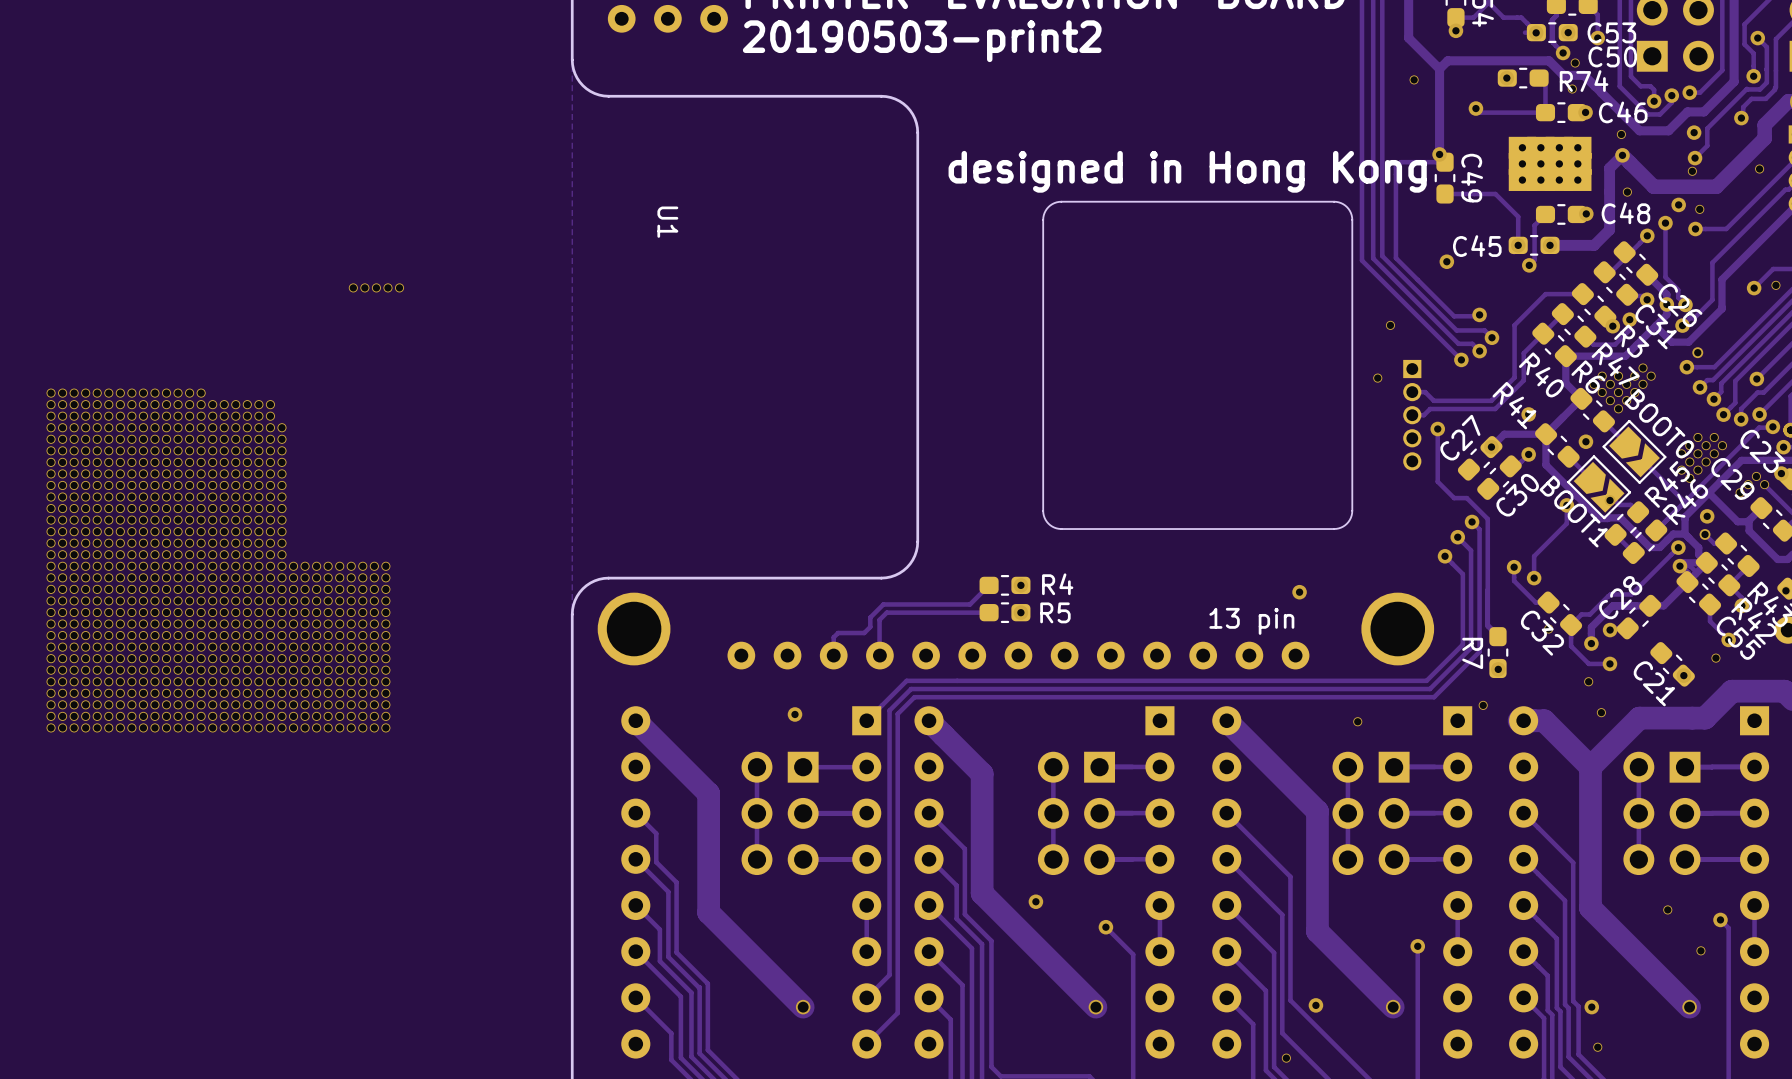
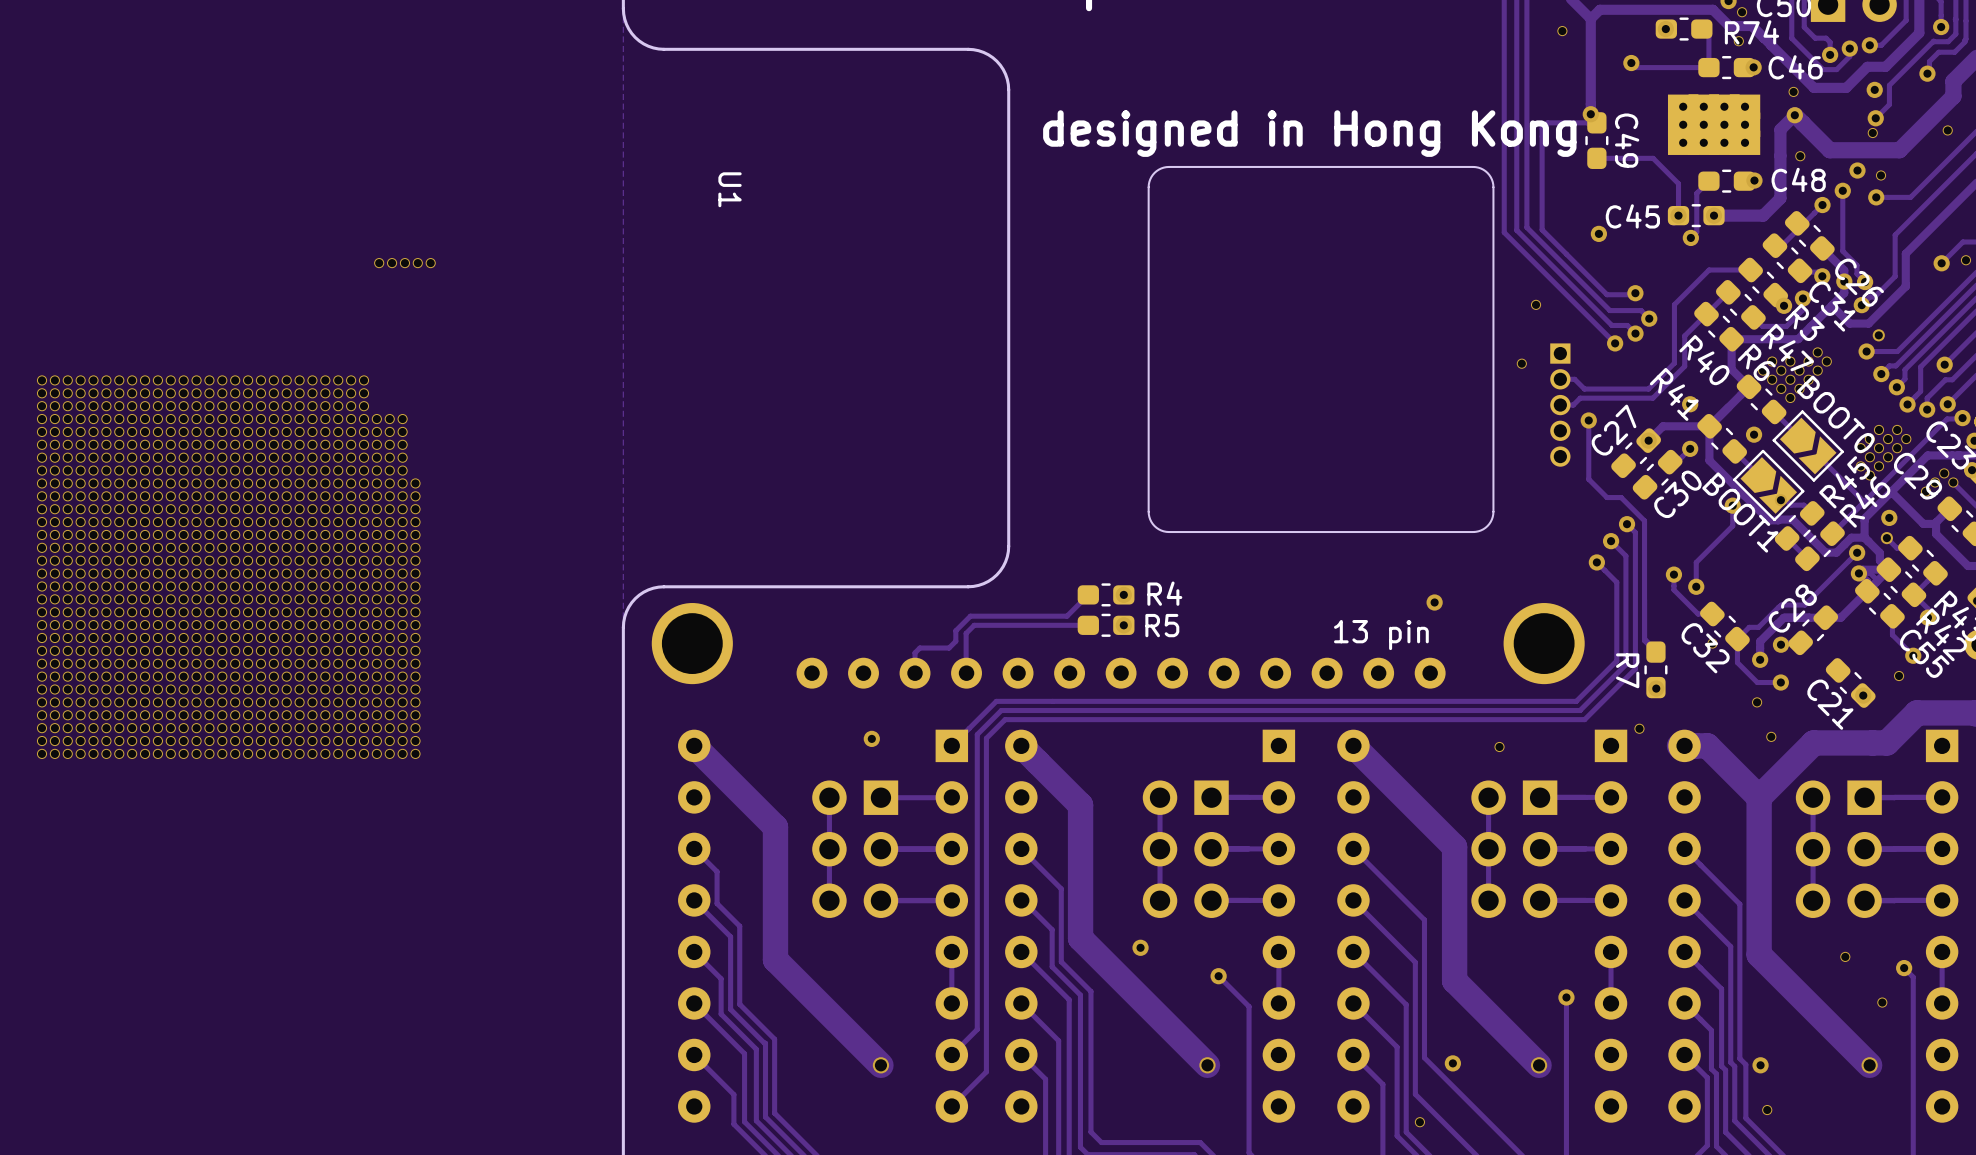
via: none -> (222, 380)
via: none -> (235, 380)
via: none -> (248, 380)
via: none -> (260, 380)
via: none -> (273, 380)
via: none -> (286, 380)
via: none -> (299, 380)
via: none -> (312, 380)
via: none -> (325, 380)
via: none -> (338, 380)
via: none -> (351, 380)
via: none -> (363, 380)
via: none -> (299, 393)
via: none -> (312, 393)
via: none -> (325, 393)
via: none -> (338, 393)
via: none -> (351, 393)
via: none -> (363, 393)
via: none -> (299, 406)
via: none -> (312, 406)
via: none -> (325, 406)
via: none -> (338, 406)
via: none -> (351, 406)
via: none -> (363, 406)
via: none -> (312, 419)
via: none -> (325, 419)
via: none -> (338, 419)
via: none -> (351, 419)
via: none -> (363, 419)
via: none -> (376, 419)
via: none -> (389, 419)
via: none -> (402, 419)
via: none -> (312, 431)
via: none -> (325, 431)
via: none -> (338, 431)
via: none -> (351, 431)
via: none -> (363, 431)
via: none -> (376, 431)
via: none -> (389, 431)
via: none -> (402, 431)
via: none -> (312, 444)
via: none -> (325, 444)
via: none -> (338, 444)
via: none -> (351, 444)
via: none -> (363, 444)
via: none -> (376, 444)
via: none -> (389, 444)
via: none -> (402, 444)
via: none -> (312, 457)
via: none -> (325, 457)
via: none -> (338, 457)
via: none -> (351, 457)
via: none -> (363, 457)
via: none -> (376, 457)
via: none -> (389, 457)
via: none -> (402, 457)
via: none -> (312, 470)
via: none -> (325, 470)
via: none -> (338, 470)
via: none -> (351, 470)
via: none -> (363, 470)
via: none -> (376, 470)
via: none -> (389, 470)
via: none -> (402, 470)
via: none -> (312, 483)
via: none -> (325, 483)
via: none -> (338, 483)
via: none -> (351, 483)
via: none -> (363, 483)
via: none -> (376, 483)
via: none -> (389, 483)
via: none -> (402, 483)
via: none -> (415, 483)
via: none -> (312, 496)
via: none -> (325, 496)
via: none -> (338, 496)
via: none -> (351, 496)
via: none -> (363, 496)
via: none -> (376, 496)
via: none -> (389, 496)
via: none -> (402, 496)
via: none -> (415, 496)
via: none -> (312, 509)
via: none -> (325, 509)
via: none -> (338, 509)
via: none -> (351, 509)
via: none -> (363, 509)
via: none -> (376, 509)
via: none -> (389, 509)
via: none -> (402, 509)
via: none -> (415, 509)
via: none -> (312, 522)
via: none -> (325, 522)
via: none -> (338, 522)
via: none -> (351, 522)
via: none -> (363, 522)
via: none -> (376, 522)
via: none -> (389, 522)
via: none -> (402, 522)
via: none -> (415, 522)
via: none -> (312, 534)
via: none -> (325, 534)
via: none -> (338, 534)
via: none -> (351, 534)
via: none -> (363, 534)
via: none -> (376, 534)
via: none -> (389, 534)
via: none -> (402, 534)
via: none -> (415, 534)
via: none -> (312, 547)
via: none -> (325, 547)
via: none -> (338, 547)
via: none -> (351, 547)
via: none -> (363, 547)
via: none -> (376, 547)
via: none -> (389, 547)
via: none -> (402, 547)
via: none -> (415, 547)
via: none -> (312, 560)
via: none -> (325, 560)
via: none -> (338, 560)
via: none -> (351, 560)
via: none -> (363, 560)
via: none -> (376, 560)
via: none -> (389, 560)
via: none -> (402, 560)
via: none -> (415, 560)

